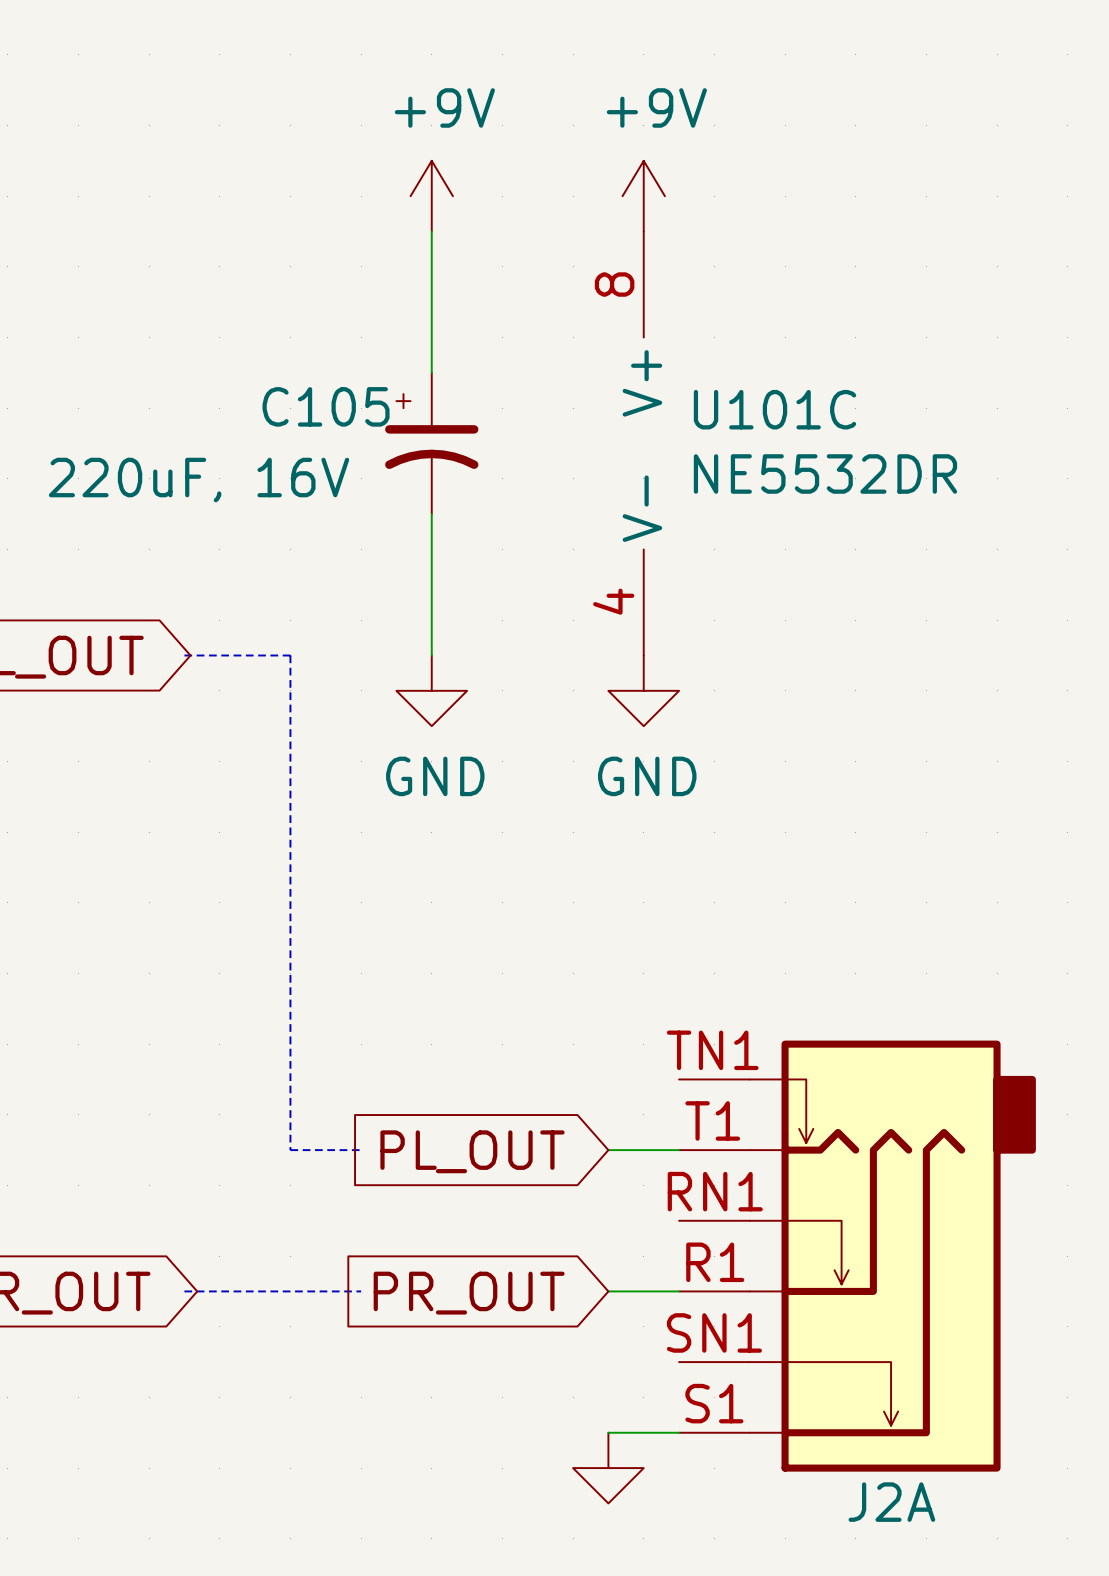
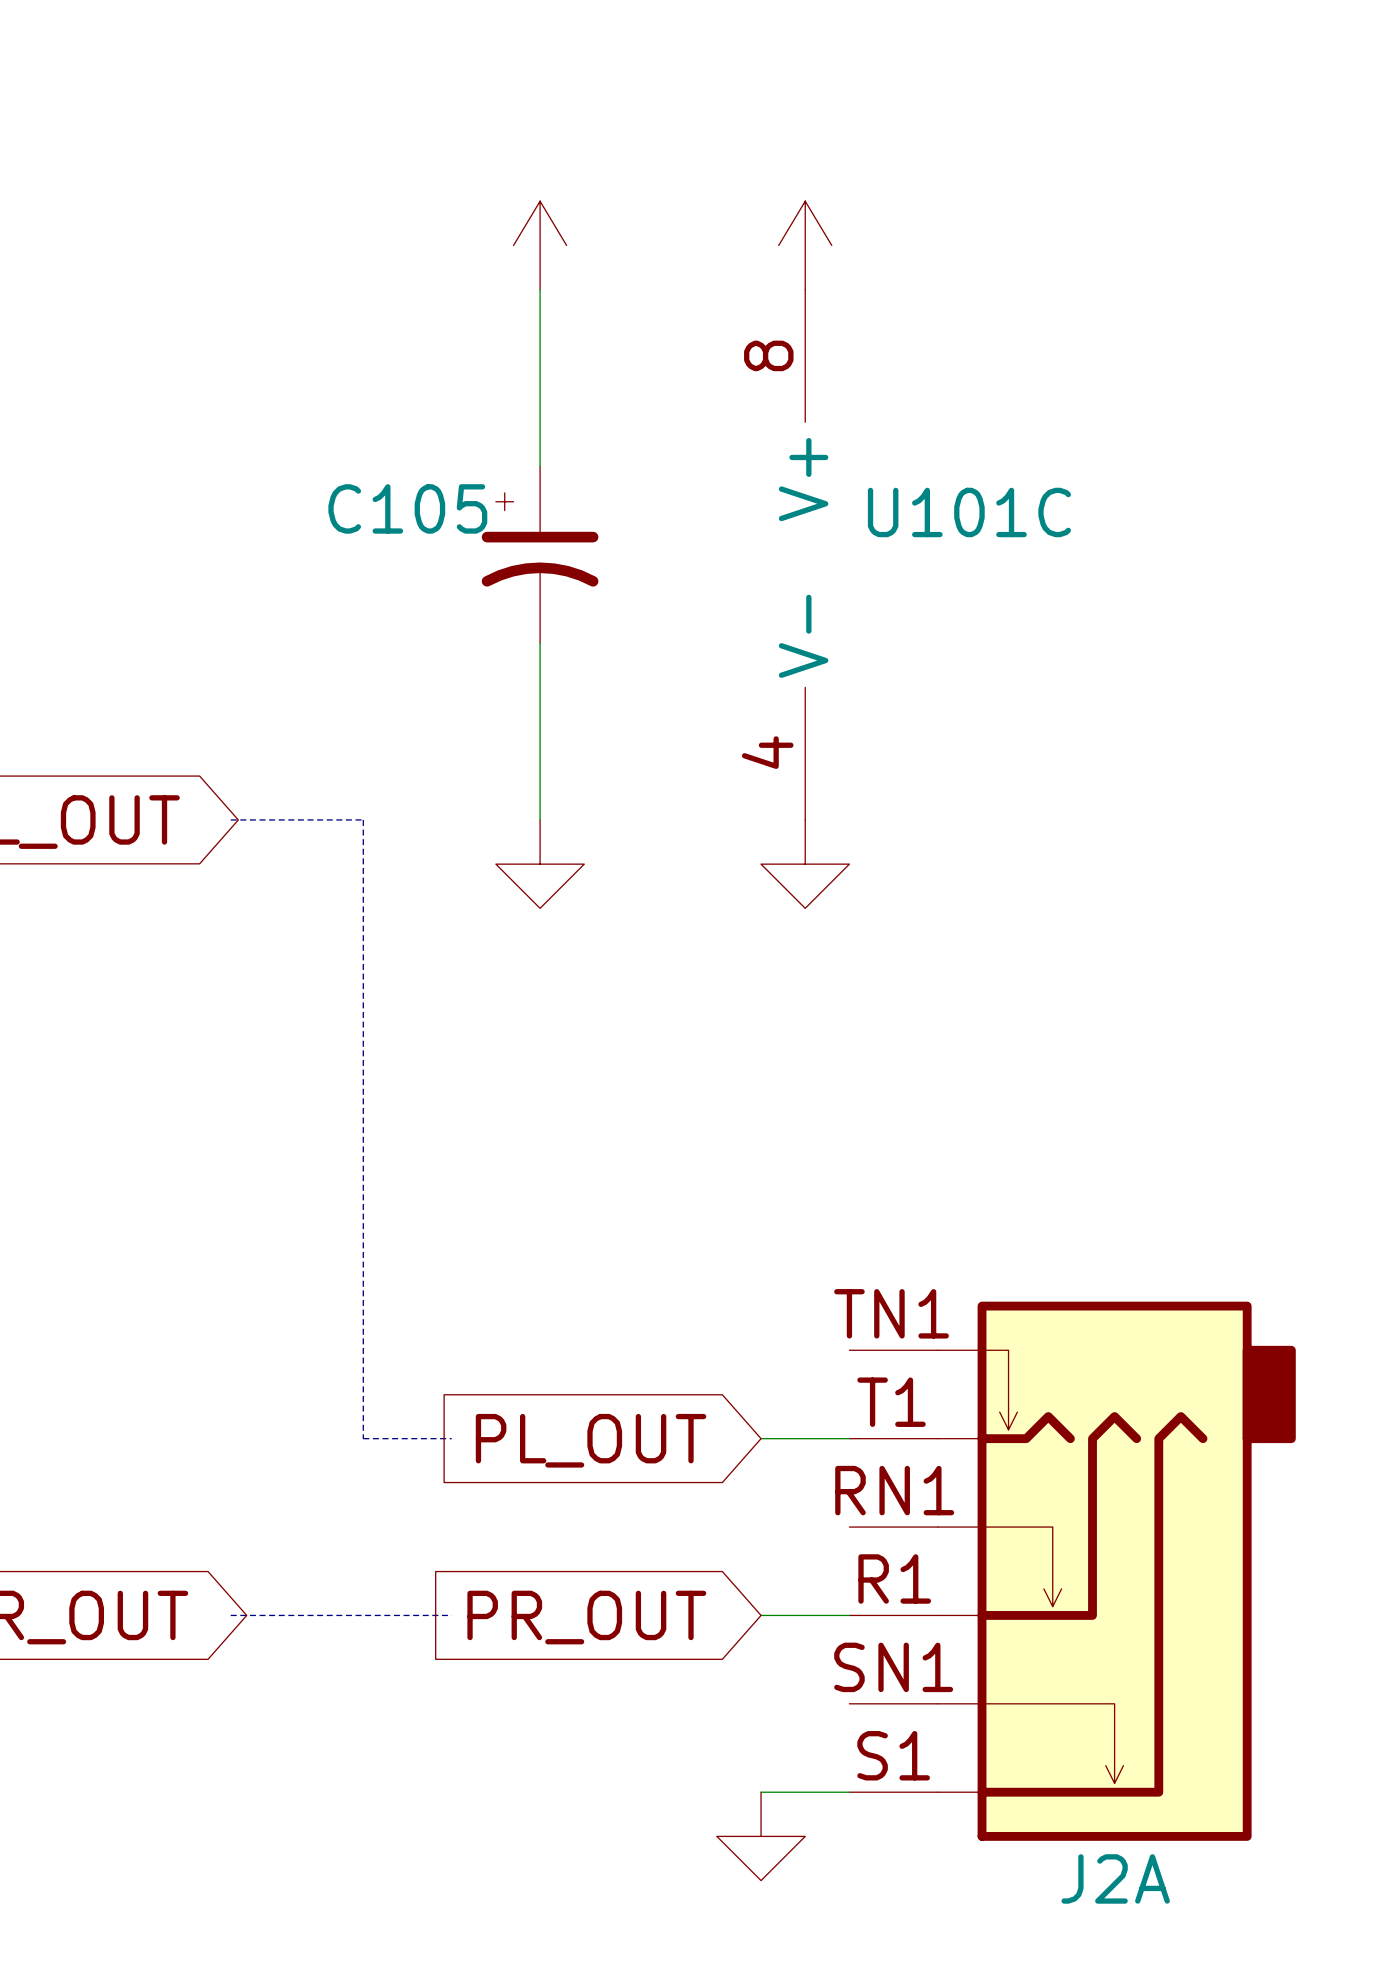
power symbol text: +9V (444, 107) -> none
power symbol text: +9V (656, 107) -> none
U101C value: NE5532DR (825, 473) -> none
C105 value: 220uF, 16V (199, 480) -> none
power symbol text: GND (435, 776) -> none
power symbol text: GND (647, 776) -> none

